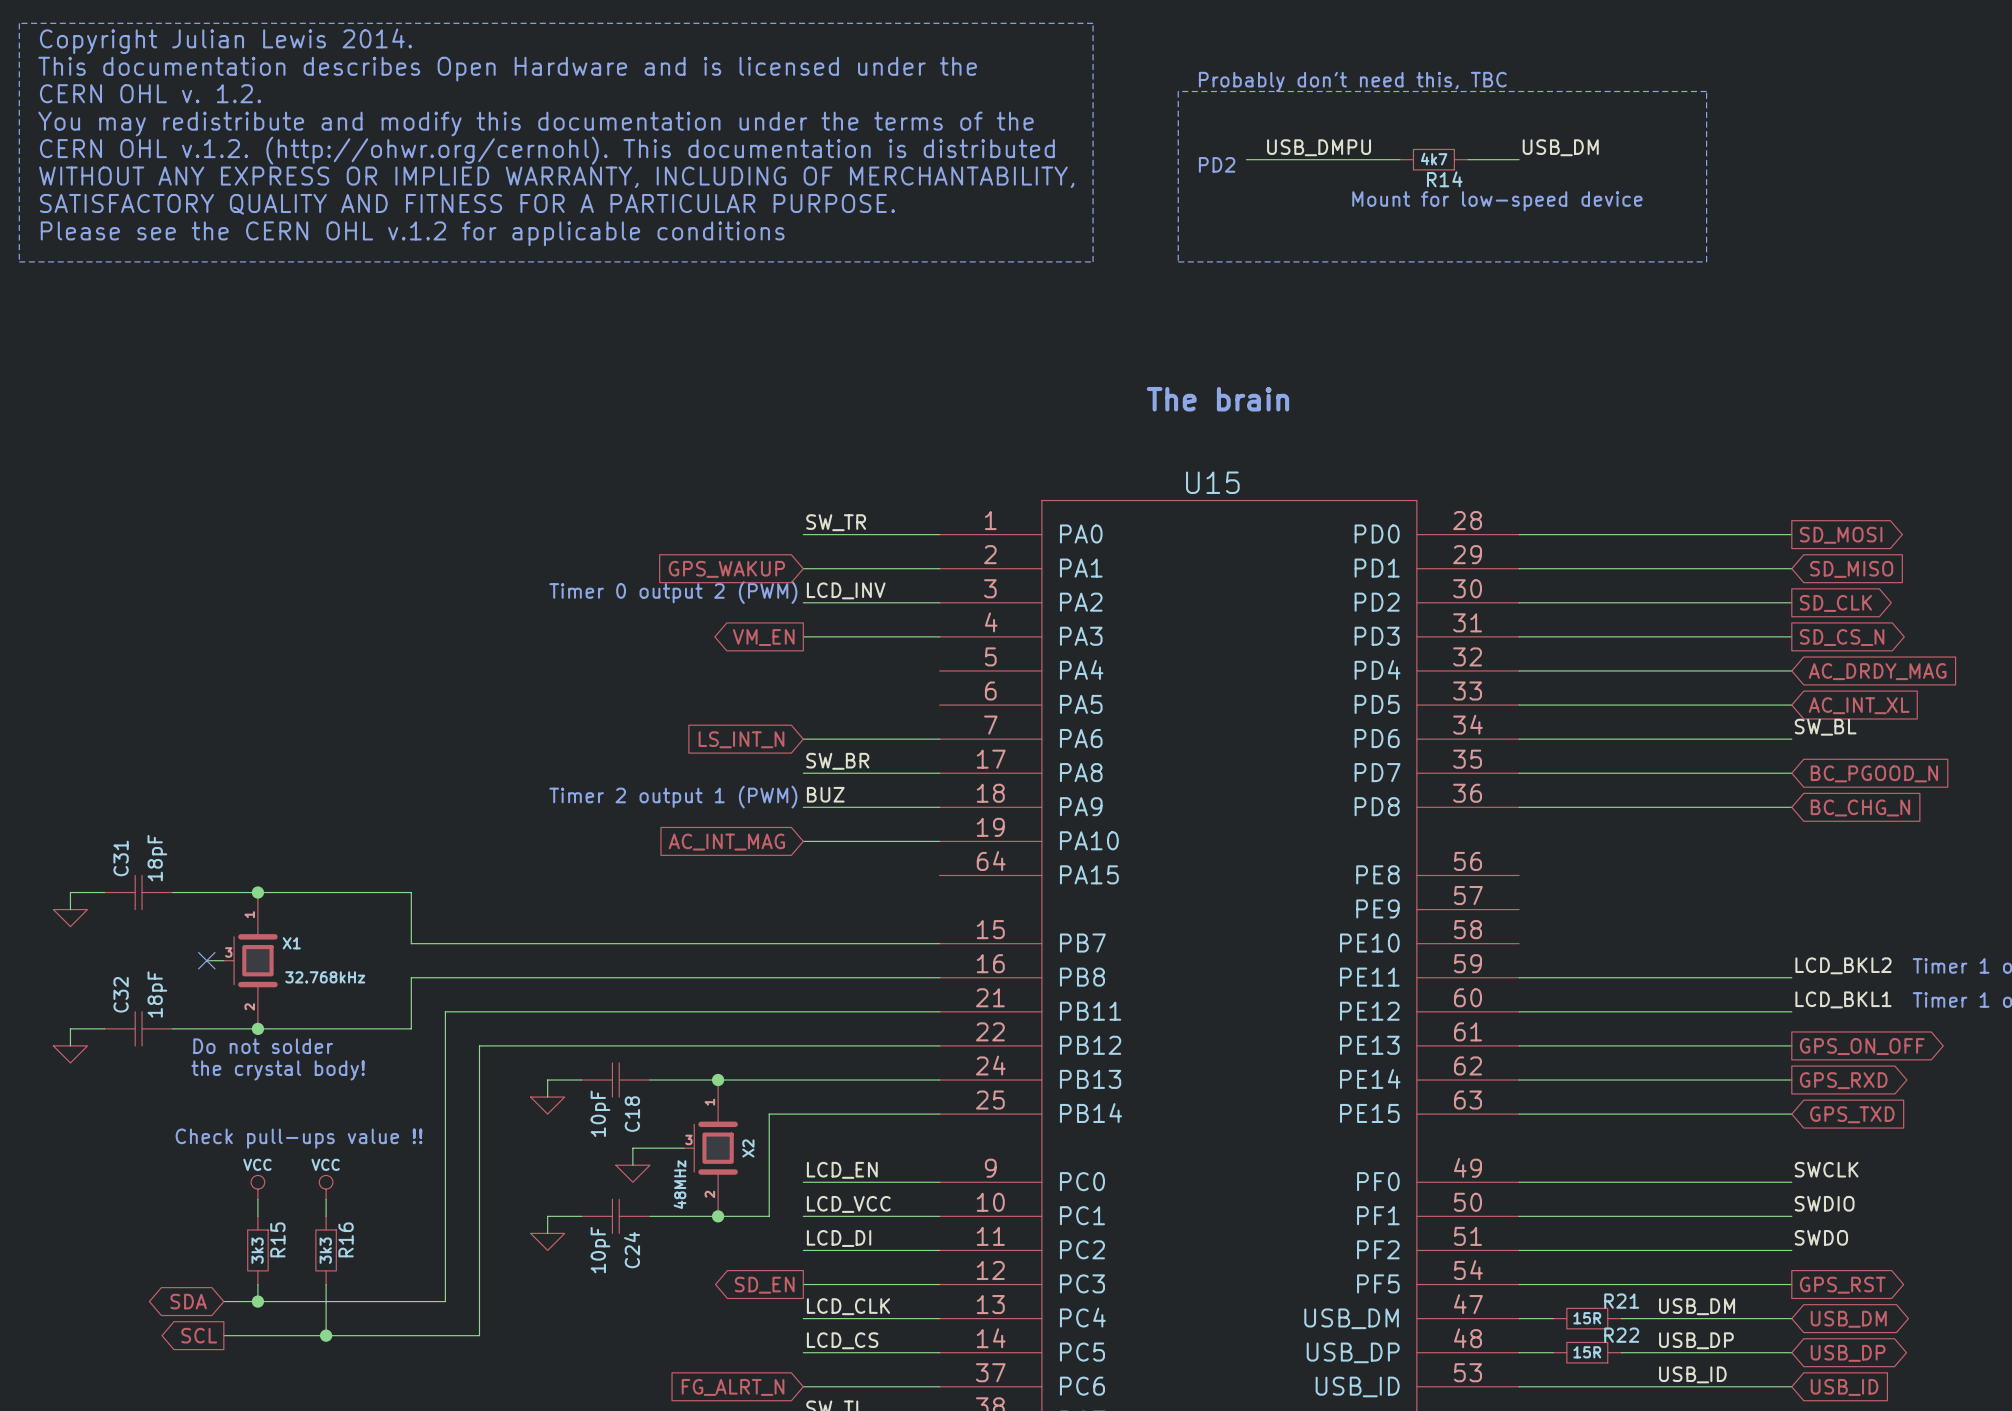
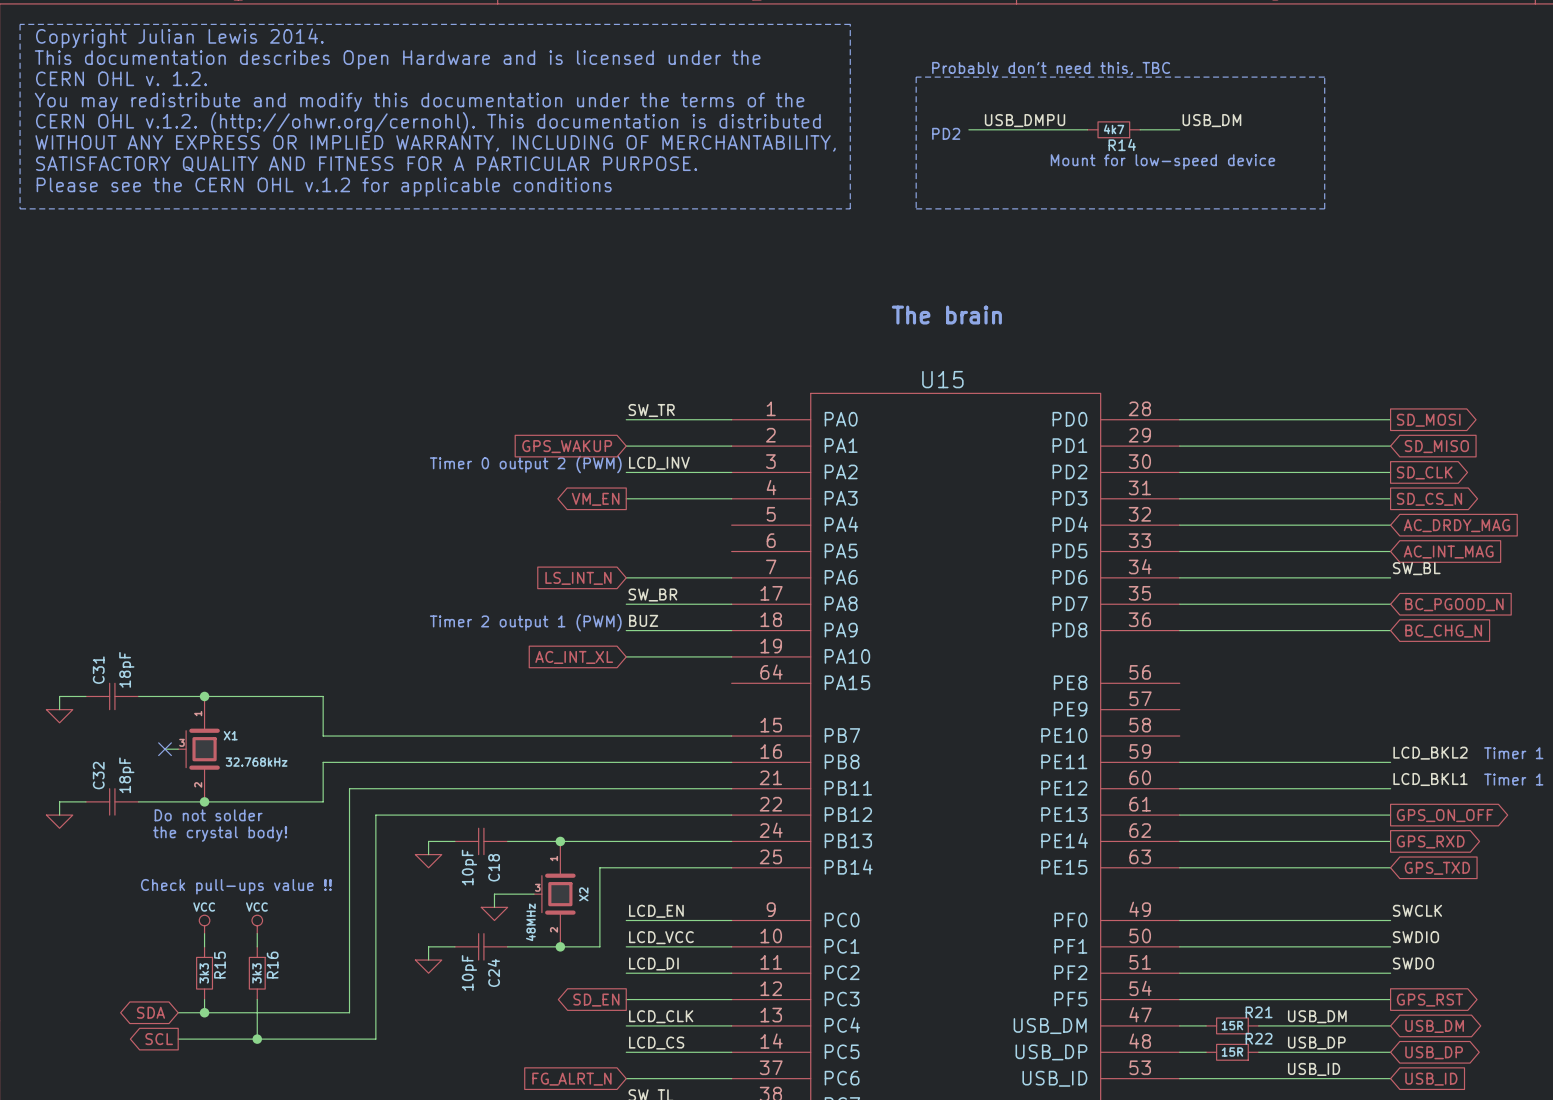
global label: AC_INT_XL (1859, 705) -> AC_INT_MAG (1448, 552)
global label: AC_INT_MAG (726, 842) -> AC_INT_XL (574, 657)

